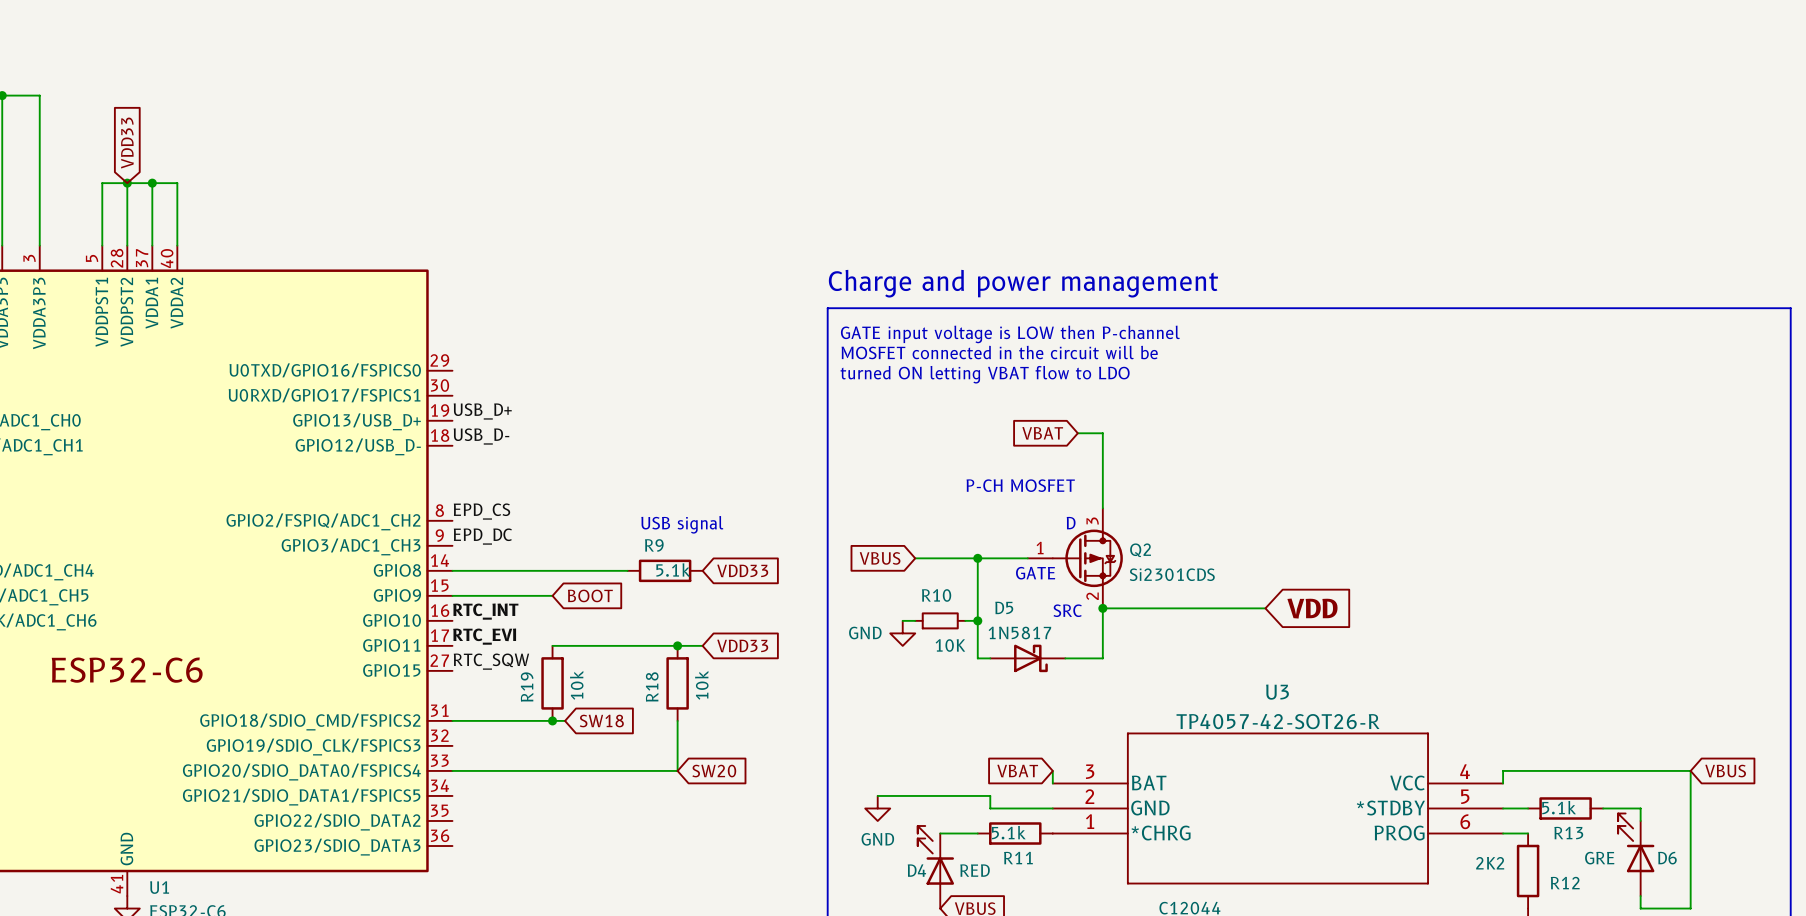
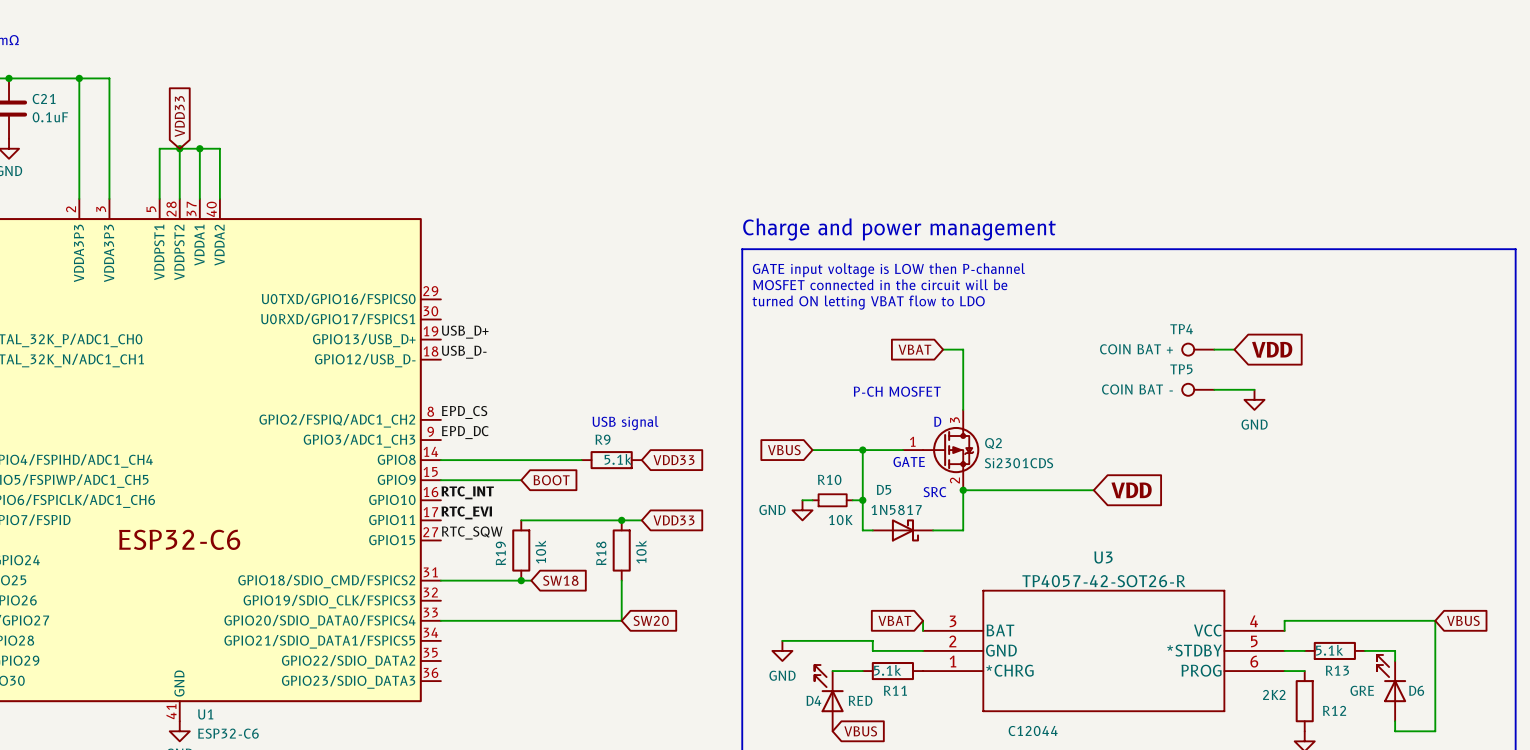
TP4: none -> COIN BAT + (1198, 349)
wire: none -> (1214, 349) (1234, 349)
global label: none -> VDD (1272, 349)
TP5: none -> COIN BAT - (1198, 389)
wire: none -> (1214, 389) (1254, 389)
power symbol: none -> GND (1254, 399)

